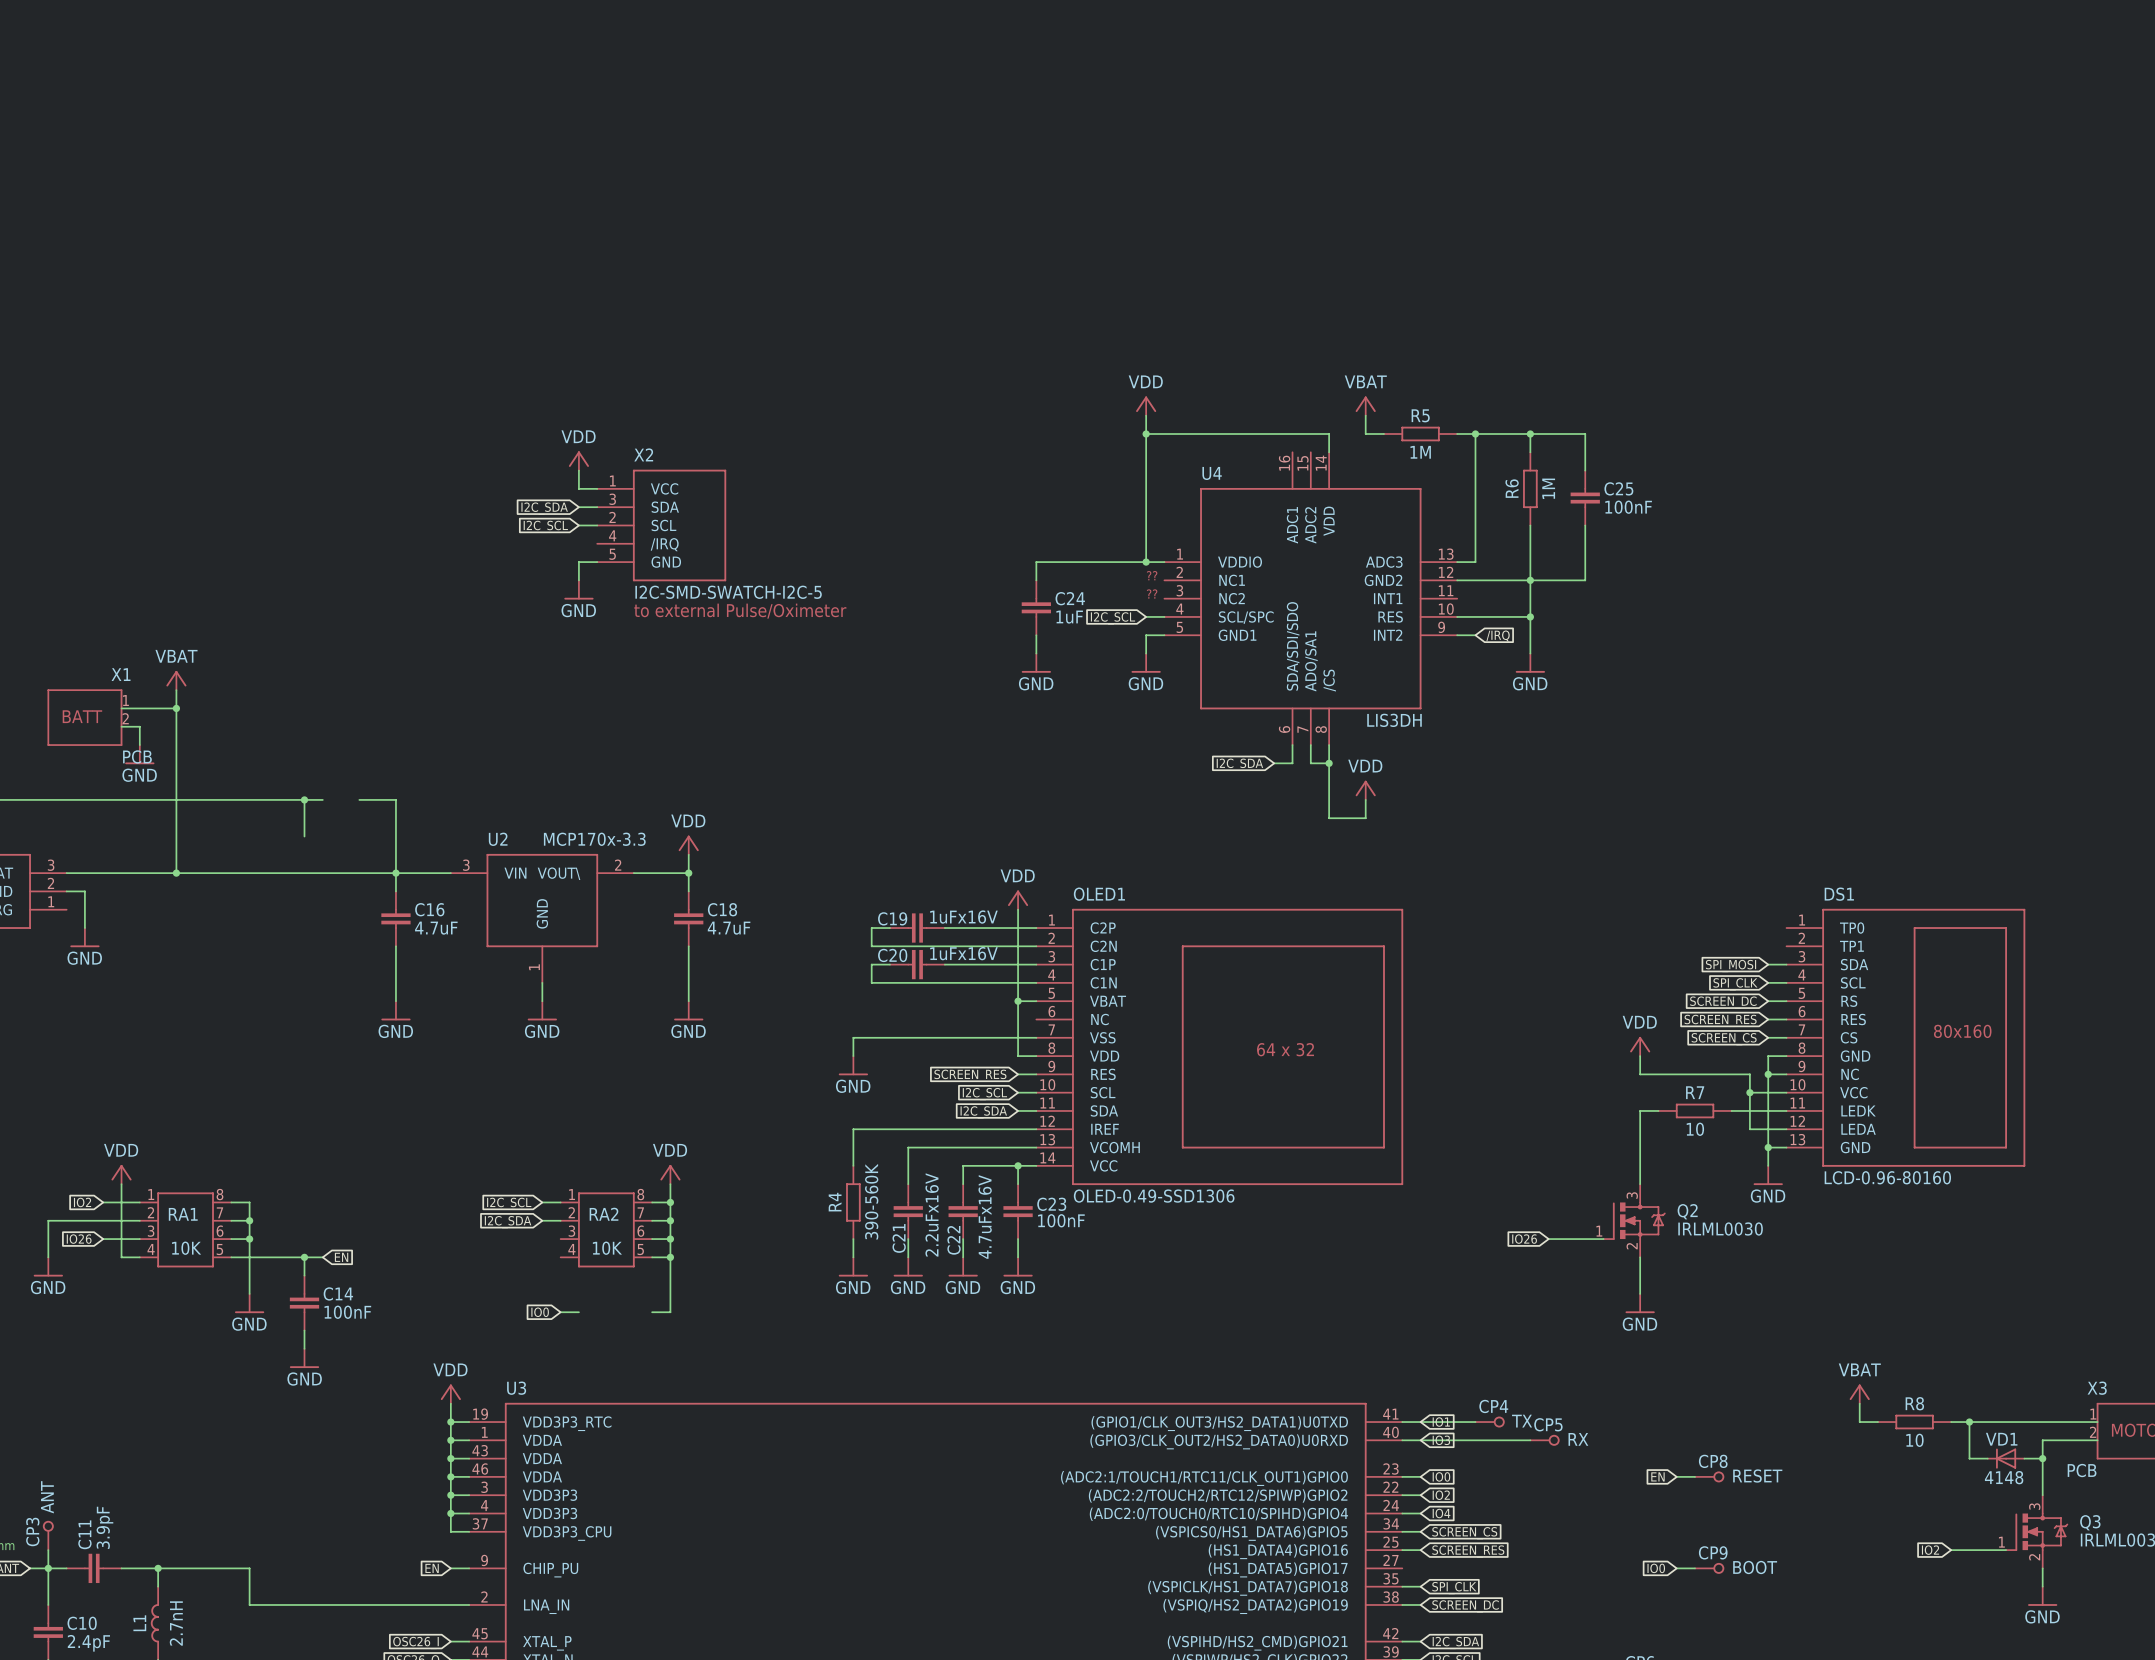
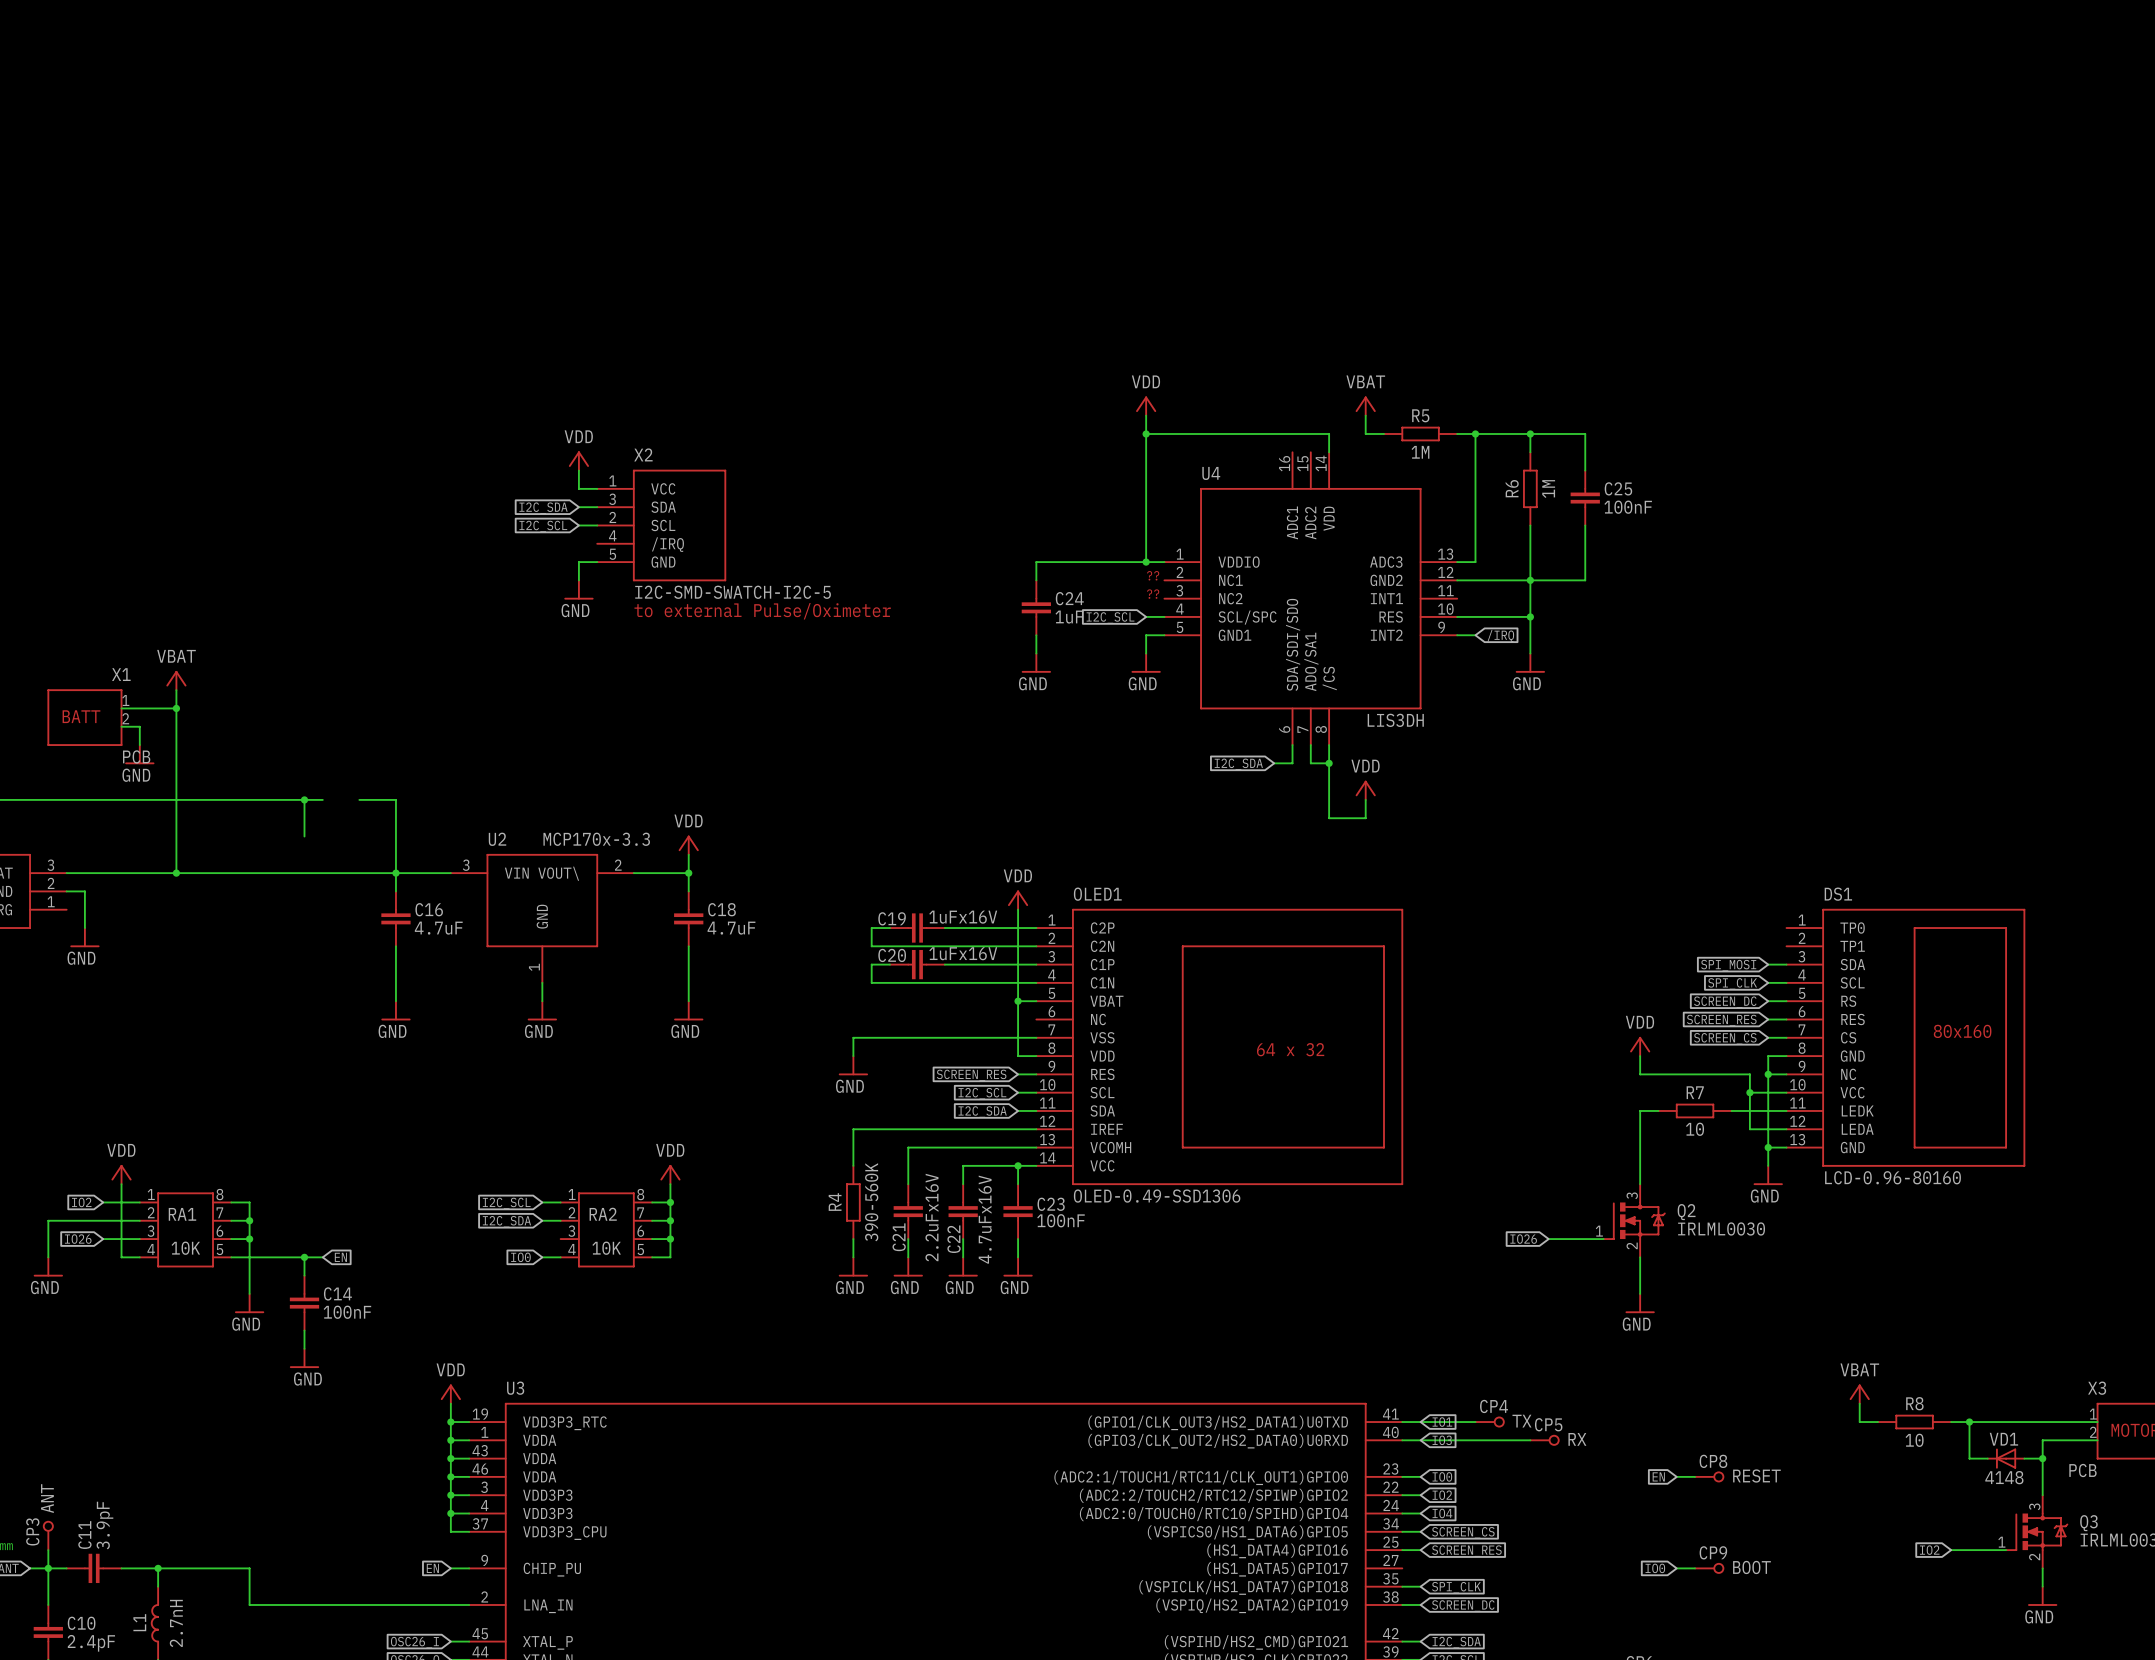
wire: (670, 1257) (670, 1312) (652, 1312) -> none
junction: (670, 1257) -> none
global label position: IO0 (540, 1312) -> IO0 (520, 1257)
wire: (560, 1312) (578, 1312) -> (542, 1257) (560, 1257)

